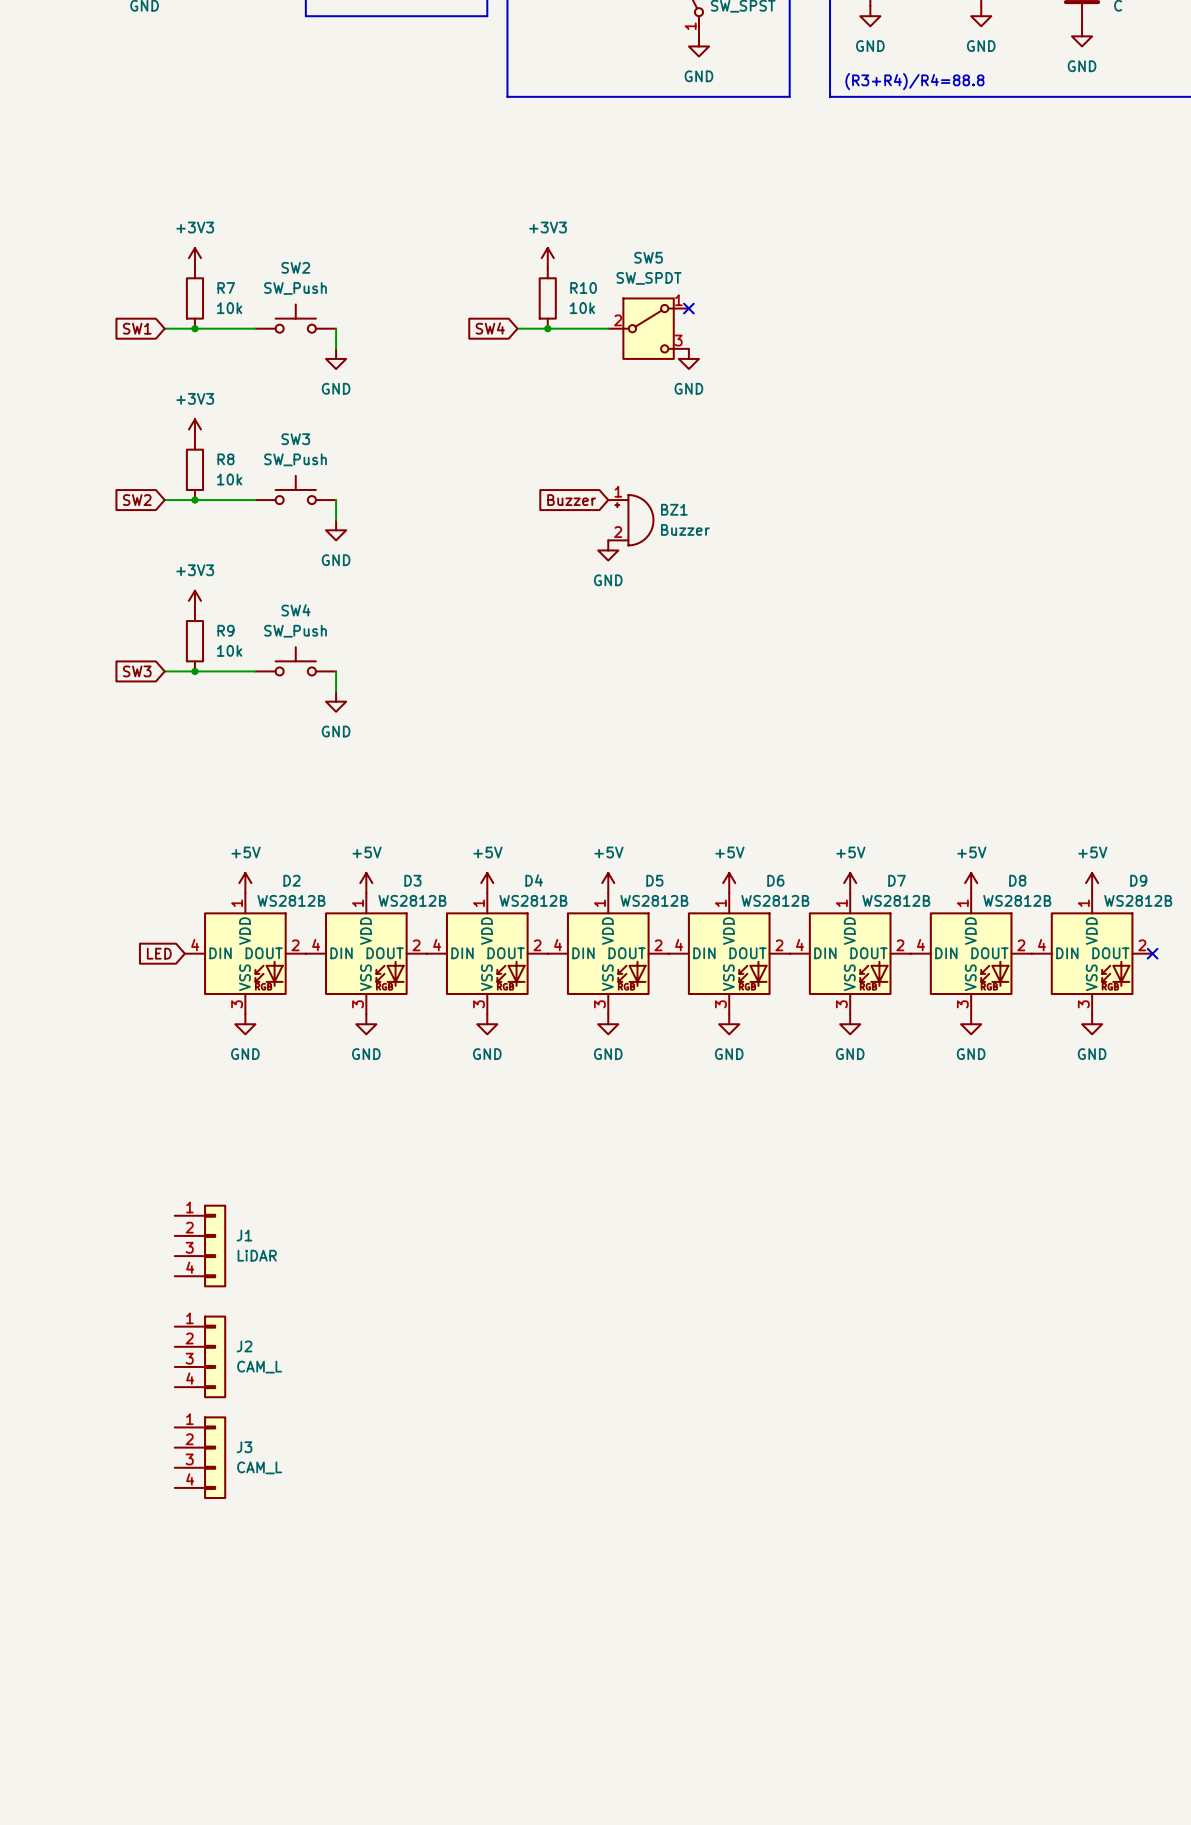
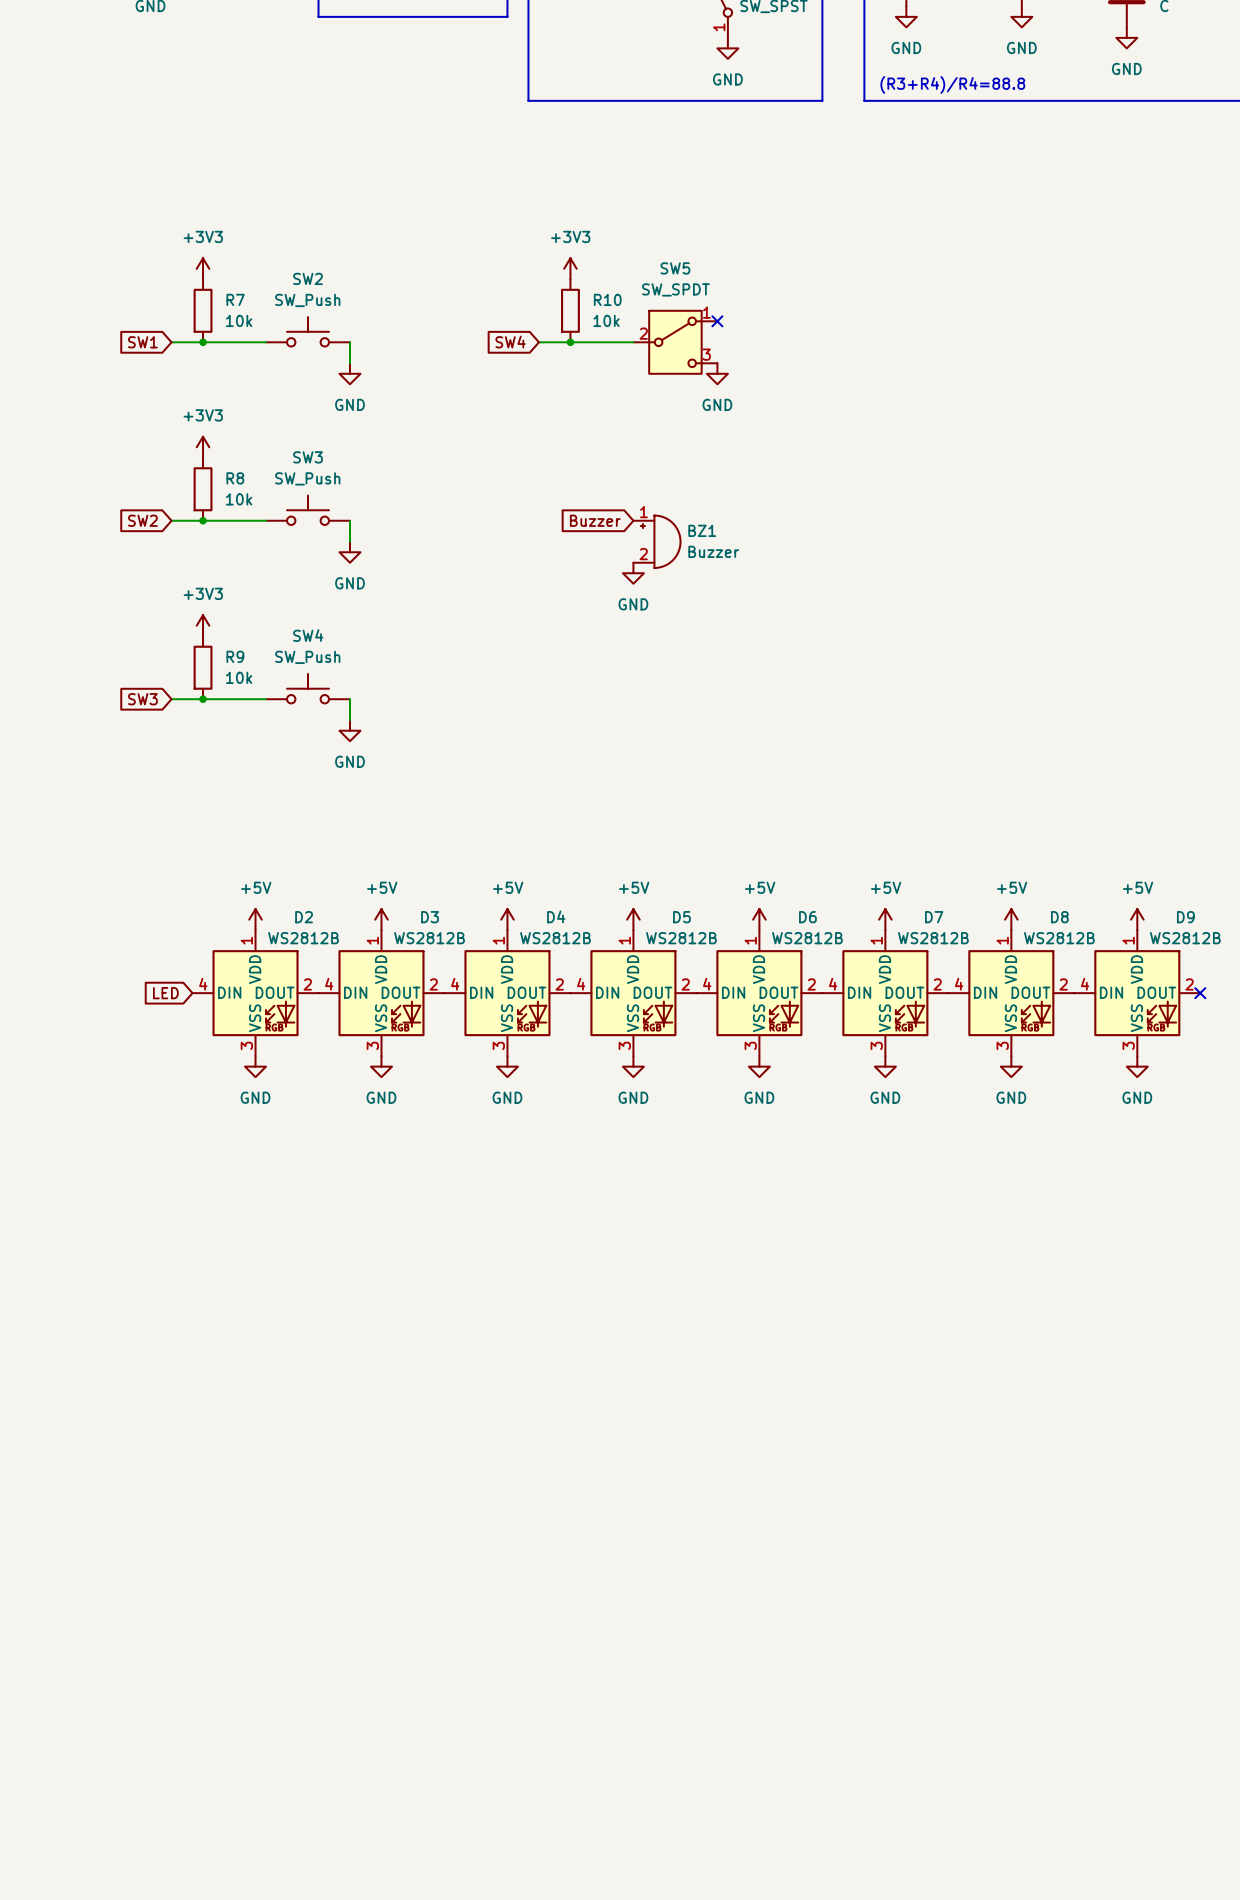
J1: LiDAR (200, 1246) -> none
J2: CAM_L (200, 1356) -> none
J3: CAM_L (200, 1457) -> none

